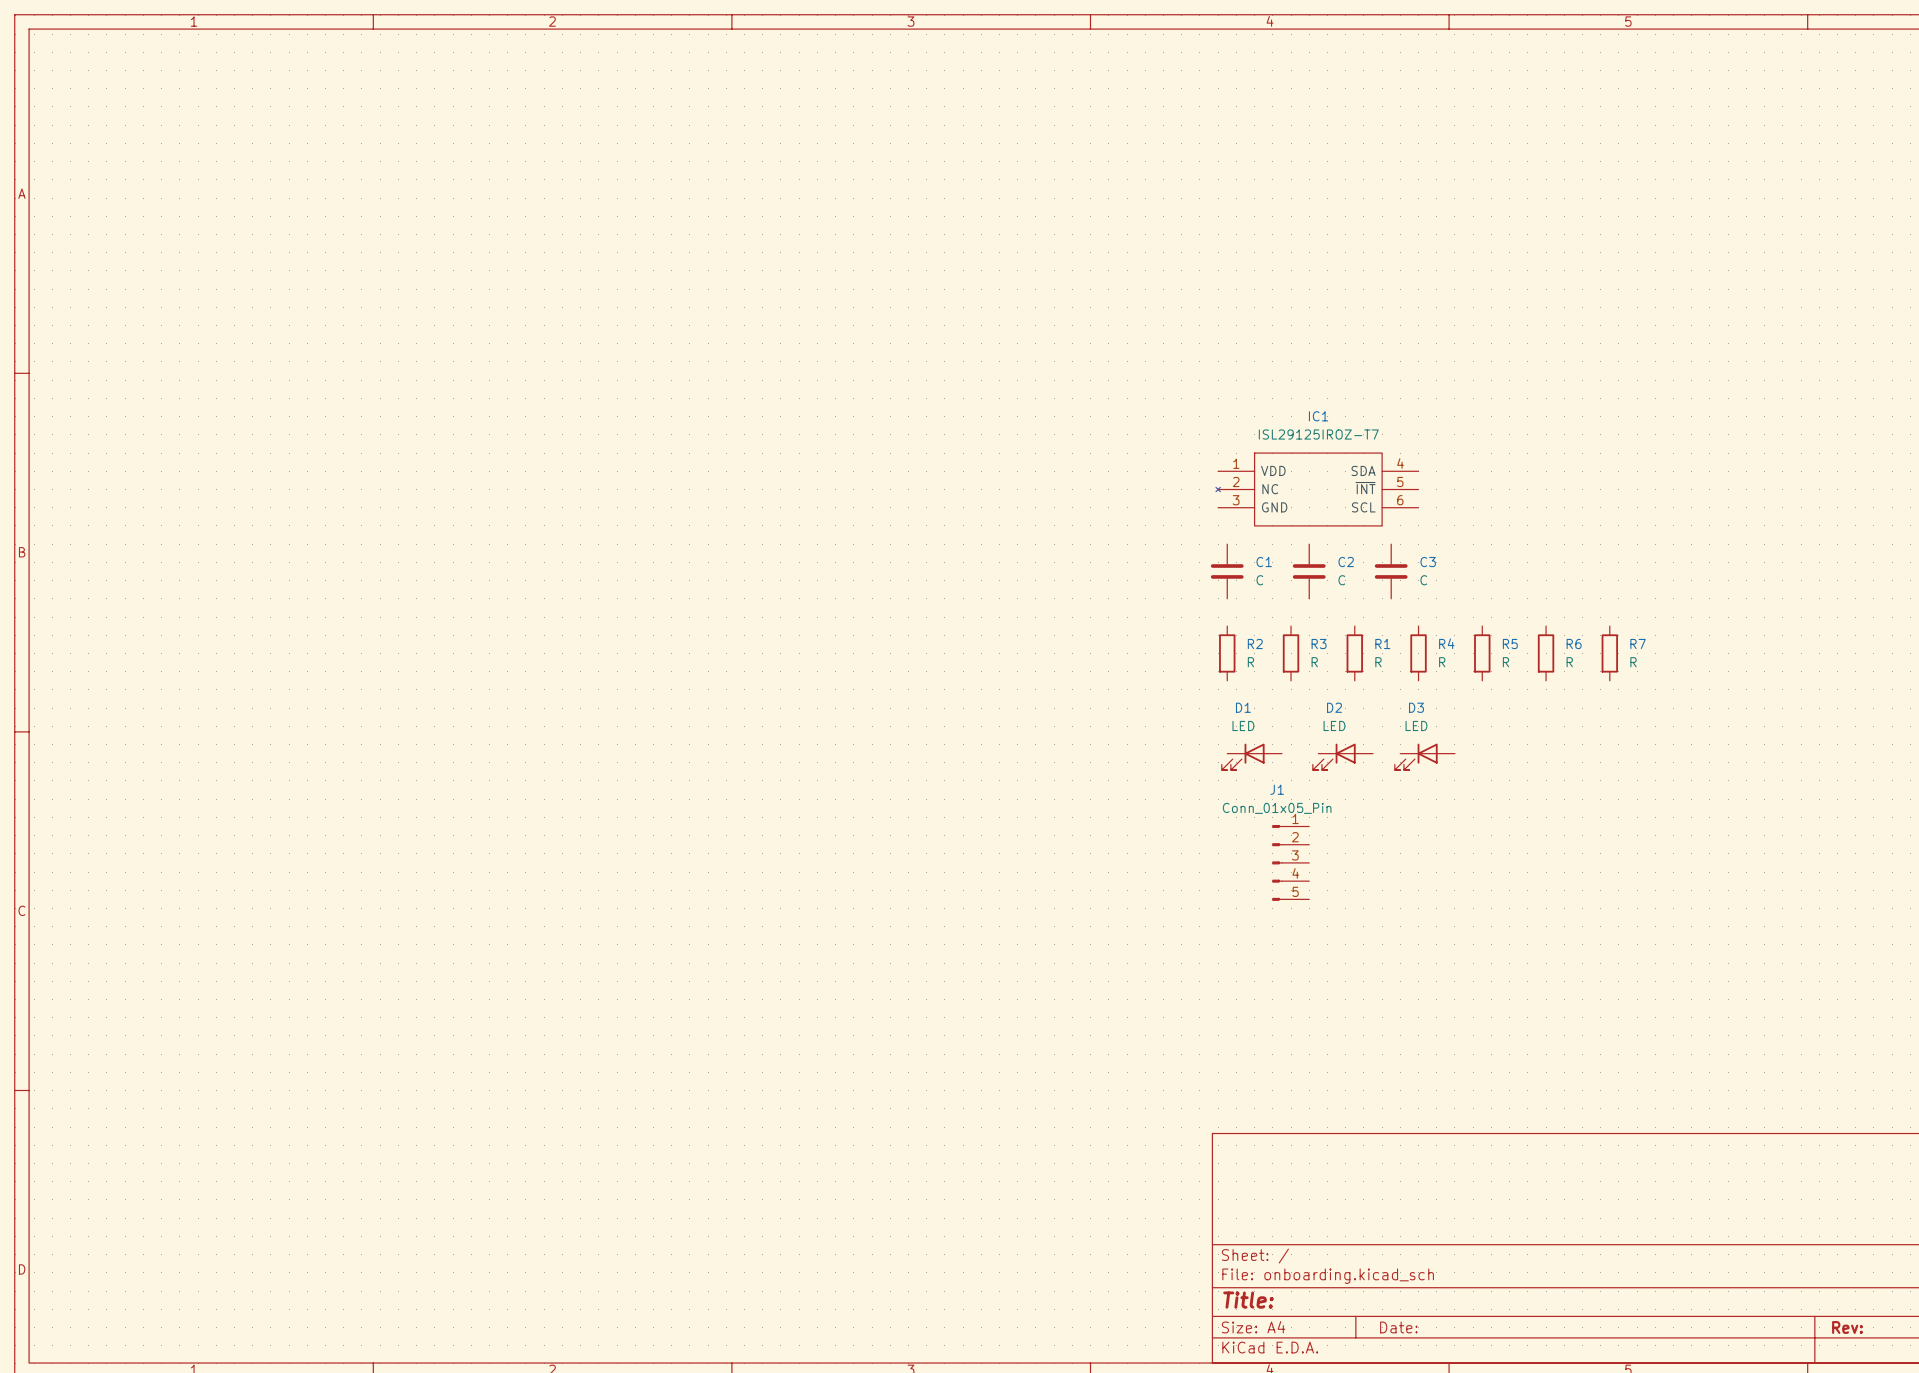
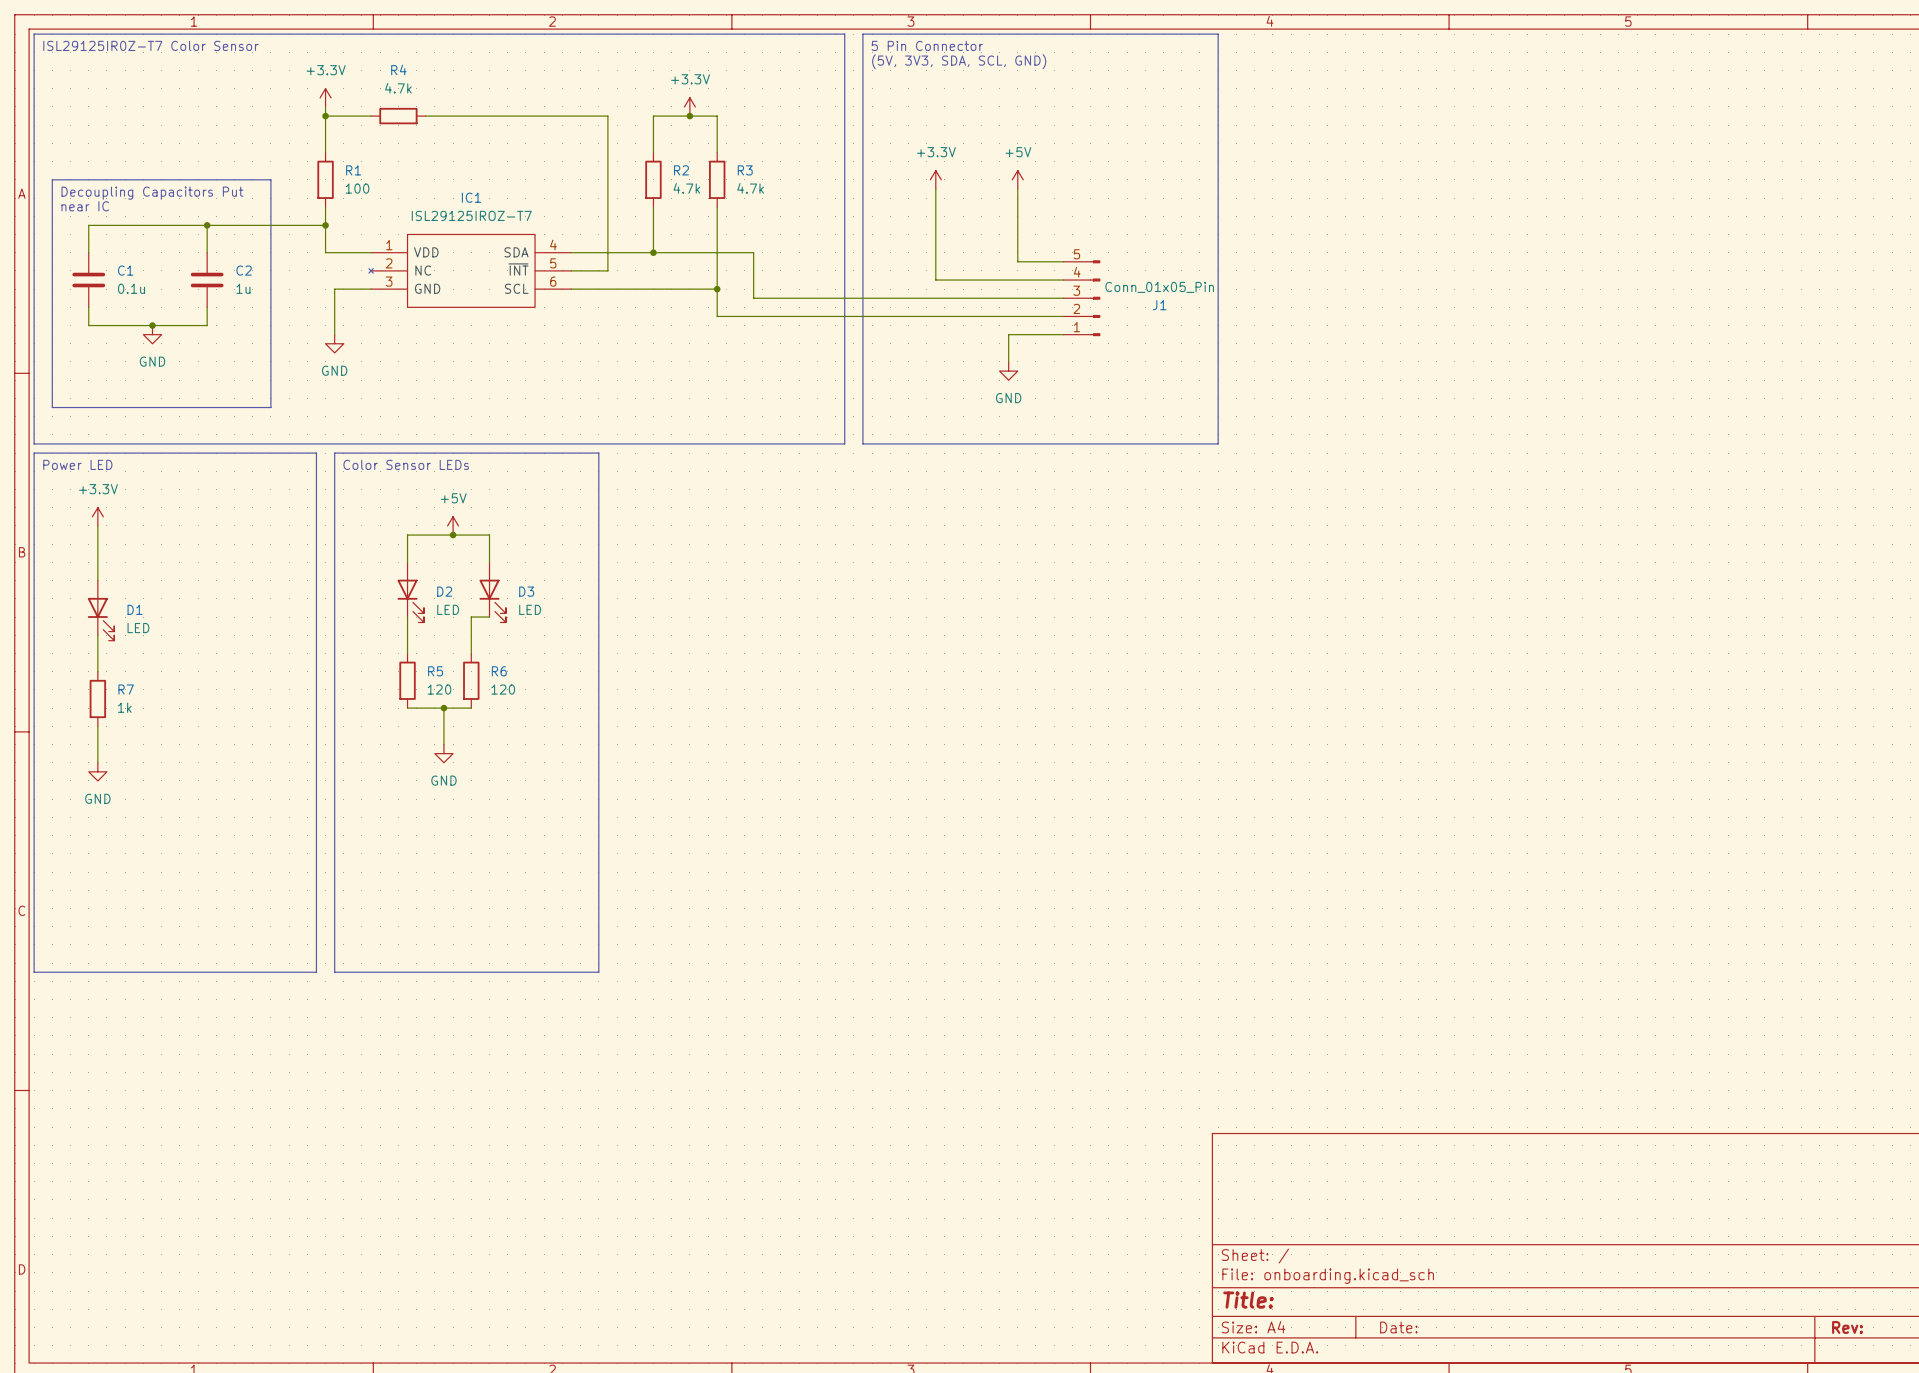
line: none -> (34, 34) (844, 34) (844, 443) (34, 443) (34, 34)
line: none -> (862, 34) (1218, 34) (1218, 443) (862, 443) (862, 34)
text: none -> ISL29125IR0Z-T7 Color Sensor (150, 45)
text: none -> 5 Pin Connector (927, 45)
text: none -> (5V, 3V3, SDA, SCL, GND) (959, 61)
power symbol: none -> +3.3V (325, 97)
wire: none -> (325, 106) (325, 152)
power symbol: none -> +3.3V (689, 106)
wire: none -> (325, 116) (371, 116)
junction: none -> (325, 116)
wire: none -> (425, 116) (607, 116) (607, 270) (571, 270)
junction: none -> (689, 116)
wire: none -> (653, 152) (653, 116) (717, 116) (717, 152)
line: none -> (52, 179) (270, 179) (270, 407) (52, 407) (52, 179)
power symbol: none -> +3.3V (935, 179)
power symbol: none -> +5V (1017, 179)
wire: none -> (935, 188) (935, 280) (1063, 280)
wire: none -> (1017, 188) (1017, 261) (1063, 261)
text: none -> Decoupling Capacitors Put (152, 193)
text: none -> near IC (85, 206)
wire: none -> (325, 207) (325, 252) (371, 252)
wire: none -> (653, 207) (653, 252)
wire: none -> (717, 207) (717, 316) (1063, 316)
wire: none -> (207, 225) (207, 252)
junction: none -> (207, 225)
wire: none -> (325, 225) (88, 225) (88, 252)
junction: none -> (325, 225)
wire: none -> (571, 252) (753, 252) (753, 298) (1063, 298)
junction: none -> (653, 252)
wire: none -> (371, 289) (334, 289) (334, 334)
wire: none -> (571, 289) (717, 289)
junction: none -> (717, 289)
wire: none -> (88, 307) (88, 325) (207, 325) (207, 307)
junction: none -> (152, 325)
power symbol: none -> GND (152, 334)
wire: none -> (1063, 334) (1008, 334) (1008, 361)
power symbol: none -> GND (334, 343)
power symbol: none -> GND (1008, 371)
line: none -> (34, 453) (316, 453) (316, 972) (34, 972) (34, 453)
line: none -> (334, 453) (598, 453) (598, 972) (334, 972) (334, 453)
text: none -> Power LED (77, 464)
text: none -> Color Sensor LEDs (406, 464)
IC1 position: (1317, 489) -> (470, 270)
power symbol: none -> +3.3V (97, 516)
wire: none -> (97, 525) (97, 580)
power symbol: none -> +5V (453, 525)
junction: none -> (453, 535)
wire: none -> (407, 562) (407, 535) (489, 535) (489, 562)
C1 position: (1227, 571) -> (88, 280)
C2 position: (1309, 571) -> (207, 280)
C3: C (1391, 571) -> none
C1 value: C (1259, 580) -> 0.1u (131, 288)
C2 value: C (1341, 580) -> 1u (243, 288)
wire: none -> (407, 617) (407, 653)
wire: none -> (489, 617) (471, 617) (471, 653)
wire: none -> (97, 635) (97, 671)
R4 name position: R4 (1446, 643) -> R4 (398, 69)
R2 position: (1227, 653) -> (653, 179)
R3 position: (1291, 653) -> (717, 179)
R1 position: (1354, 653) -> (325, 179)
R4 rotation: 0° (1418, 653) -> 90° clockwise (398, 116)
R4 position: (1418, 653) -> (398, 116)
R5 position: (1482, 653) -> (407, 680)
R6 position: (1546, 653) -> (471, 680)
R7 position: (1609, 653) -> (97, 698)
R2 value: R (1250, 662) -> 4.7k (686, 188)
R3 value: R (1314, 662) -> 4.7k (750, 188)
R1 value: R (1378, 662) -> 100 (357, 188)
R4 value: R (1442, 662) -> 4.7k (398, 88)
R5 value: R (1505, 662) -> 120 (439, 689)
R6 value: R (1569, 662) -> 120 (503, 689)
R7 value: R (1633, 662) -> 1k (124, 707)
D1 name position: D1 (1243, 707) -> D1 (135, 609)
D2 name position: D2 (1334, 707) -> D2 (444, 591)
D3 name position: D3 (1416, 707) -> D3 (526, 591)
wire: none -> (407, 708) (471, 708)
wire: none -> (443, 708) (443, 744)
junction: none -> (443, 708)
D1 value position: LED (1243, 725) -> LED (138, 628)
D2 value position: LED (1334, 725) -> LED (448, 609)
D3 value position: LED (1416, 725) -> LED (530, 609)
wire: none -> (97, 726) (97, 762)
power symbol: none -> GND (443, 753)
D1 rotation: 0° (1243, 756) -> 90° counterclockwise (101, 619)
D1 position: (1251, 756) -> (101, 610)
D2 rotation: 0° (1334, 756) -> 90° counterclockwise (410, 601)
D2 position: (1342, 756) -> (410, 592)
D3 rotation: 0° (1416, 756) -> 90° counterclockwise (492, 601)
D3 position: (1424, 756) -> (492, 592)
power symbol: none -> GND (97, 771)
J1 name position: J1 (1277, 789) -> J1 (1159, 305)
J1 value position: Conn_01x05_Pin (1277, 808) -> Conn_01x05_Pin (1159, 287)
J1 rotation: 0° (1277, 862) -> 180° (1095, 298)
J1 position: (1290, 862) -> (1081, 298)

